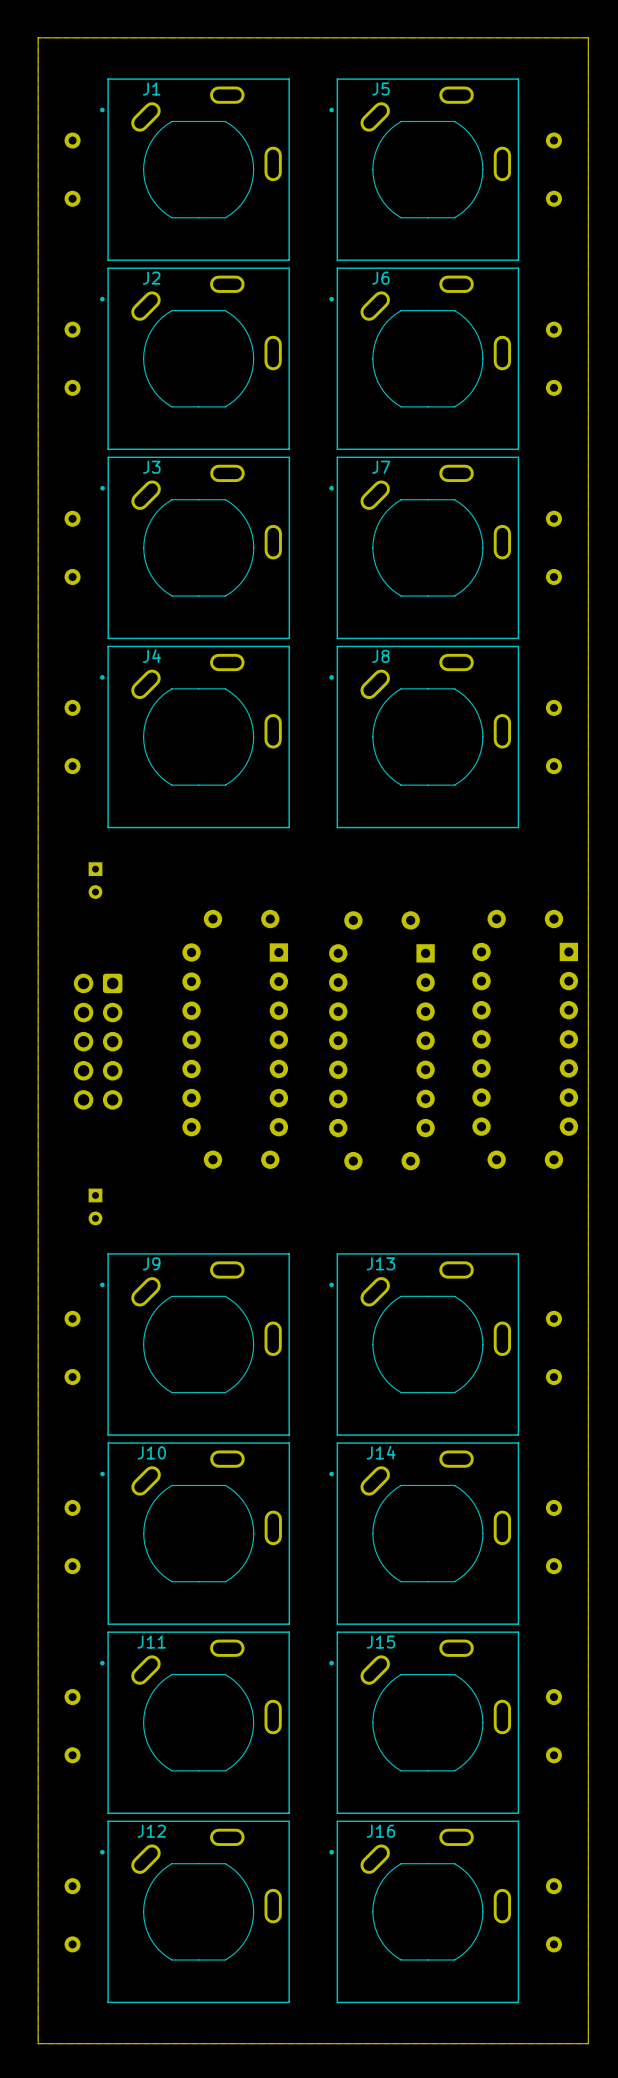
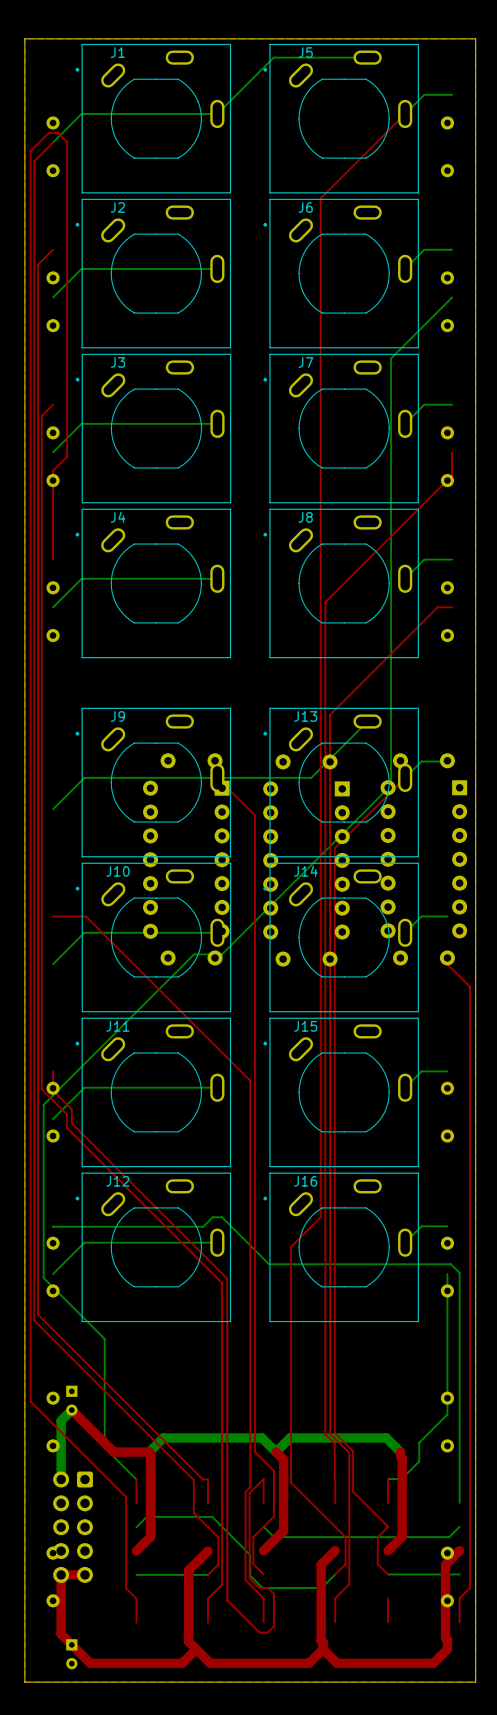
bottom track: none -> (367, 57) (273, 57) (217, 113) (81, 113) (53, 142)
bottom track: none -> (452, 94) (424, 94) (405, 113)
top track: none -> (405, 113) (320, 198) (320, 1217) (291, 1246) (291, 1482) (345, 1537) (345, 1564) (335, 1574)
top track: none -> (53, 142) (34, 161) (34, 1320) (193, 1480) (193, 1513) (218, 1537) (218, 1564) (207, 1574)
J1 position: (195, 169) -> (153, 118)
J5 position: (424, 169) -> (341, 118)
top track: none -> (53, 249) (38, 264) (38, 1314) (202, 1479) (207, 1479) (207, 1503)
bottom track: none -> (452, 249) (424, 249) (405, 268)
bottom track: none -> (217, 268) (81, 268) (53, 297)
bottom track: none -> (452, 297) (391, 358) (391, 785) (222, 954) (194, 954) (43, 1104) (43, 1277) (104, 1338) (104, 1447) (136, 1479)
J2 position: (195, 358) -> (153, 273)
J6 position: (424, 358) -> (341, 273)
top track: none -> (53, 404) (41, 415) (41, 1089) (67, 1114) (67, 1128) (222, 1283) (222, 1584) (207, 1598) (207, 1622)
bottom track: none -> (452, 404) (424, 404) (405, 423)
bottom track: none -> (217, 423) (81, 423) (53, 452)
top track: none -> (452, 452) (452, 475) (325, 602) (325, 1434) (334, 1443) (335, 1502)
J3 position: (195, 547) -> (153, 428)
J7 position: (424, 547) -> (341, 428)
top track: none -> (53, 559) (53, 470) (67, 456) (67, 142) (57, 132) (48, 132) (30, 151) (30, 1401) (126, 1496) (126, 1588) (136, 1598) (136, 1622)
bottom track: none -> (452, 559) (424, 559) (405, 578)
bottom track: none -> (217, 578) (81, 578) (53, 607)
top track: none -> (452, 607) (437, 607) (330, 714) (330, 1433) (349, 1452) (349, 1584) (335, 1598) (335, 1622)
J4 position: (195, 737) -> (153, 583)
J8 position: (424, 737) -> (341, 583)
bottom track: none -> (367, 721) (311, 777) (84, 777) (53, 809)
part: (95, 880) -> none
bottom track: none -> (447, 761) (421, 761) (405, 777)
top track: none -> (217, 777) (254, 815) (254, 1452) (274, 1471) (274, 1516) (253, 1537) (253, 1564) (263, 1574)
top track: none -> (405, 777) (334, 848) (334, 1432) (353, 1451) (353, 1491) (388, 1526) (377, 1537) (377, 1564) (388, 1574)
part: (98, 1041) -> none
top track: none -> (53, 916) (85, 916) (250, 1080) (250, 1487) (245, 1491) (245, 1580) (263, 1598) (263, 1622)
bottom track: none -> (447, 916) (421, 916) (405, 932)
bottom track: none -> (217, 932) (84, 932) (53, 964)
top track: none -> (447, 964) (469, 986) (469, 1588) (459, 1598) (459, 1622)
part: (95, 1206) -> none
top track: none -> (53, 1071) (53, 1090) (71, 1109) (71, 1123) (227, 1278) (227, 1600) (259, 1632) (267, 1632) (274, 1626) (274, 1594) (267, 1588) (259, 1588) (249, 1578) (249, 1493) (263, 1479) (263, 1502)
bottom track: none -> (447, 1071) (421, 1071) (405, 1087)
bottom track: none -> (217, 1087) (84, 1087) (53, 1119)
J9 position: (195, 1344) -> (153, 782)
J13 position: (424, 1344) -> (341, 782)
bottom track: none -> (53, 1226) (203, 1226) (212, 1217) (222, 1217) (269, 1264) (450, 1264) (459, 1272) (459, 1502)
bottom track: none -> (447, 1226) (421, 1226) (405, 1242)
bottom track: none -> (217, 1242) (84, 1242) (53, 1274)
J10 position: (195, 1533) -> (153, 937)
J14 position: (424, 1533) -> (341, 937)
bottom track: none -> (447, 1274) (447, 1414) (419, 1442) (419, 1461) (401, 1479) (388, 1479)
part: none -> (71, 1400)
top track: none -> (71, 1410) (113, 1452) (150, 1453) (150, 1536) (136, 1551)
bottom track: none -> (71, 1410) (61, 1420) (61, 1479)
J11 position: (195, 1722) -> (153, 1092)
J15 position: (424, 1722) -> (341, 1092)
bottom track: none -> (149, 1452) (163, 1437) (261, 1437) (276, 1452) (290, 1437) (386, 1437) (400, 1452)
top track: none -> (276, 1452) (283, 1459) (283, 1530) (263, 1550)
top track: none -> (400, 1452) (402, 1458) (402, 1536) (388, 1550)
top track: none -> (388, 1479) (388, 1502)
top track: none -> (136, 1479) (136, 1503)
part: none -> (73, 1527)
bottom track: none -> (136, 1527) (146, 1516) (212, 1516) (250, 1554) (250, 1575) (262, 1588) (321, 1588) (335, 1574)
bottom track: none -> (263, 1526) (274, 1537) (449, 1537) (459, 1526)
top track: none -> (207, 1551) (188, 1570) (188, 1641) (210, 1663) (308, 1663) (323, 1649)
top track: none -> (335, 1550) (321, 1564) (321, 1640) (323, 1649)
top track: none -> (459, 1550) (445, 1564) (445, 1638) (447, 1639) (447, 1649) (433, 1663) (337, 1663) (323, 1649)
J12 position: (195, 1911) -> (153, 1247)
J16 position: (424, 1911) -> (341, 1247)
top track: none -> (84, 1574) (61, 1574) (61, 1634) (90, 1663) (182, 1663) (196, 1649)
bottom track: none -> (136, 1574) (207, 1574)
bottom track: none -> (388, 1574) (459, 1574)
top track: none -> (388, 1598) (388, 1622)
part: none -> (71, 1654)

